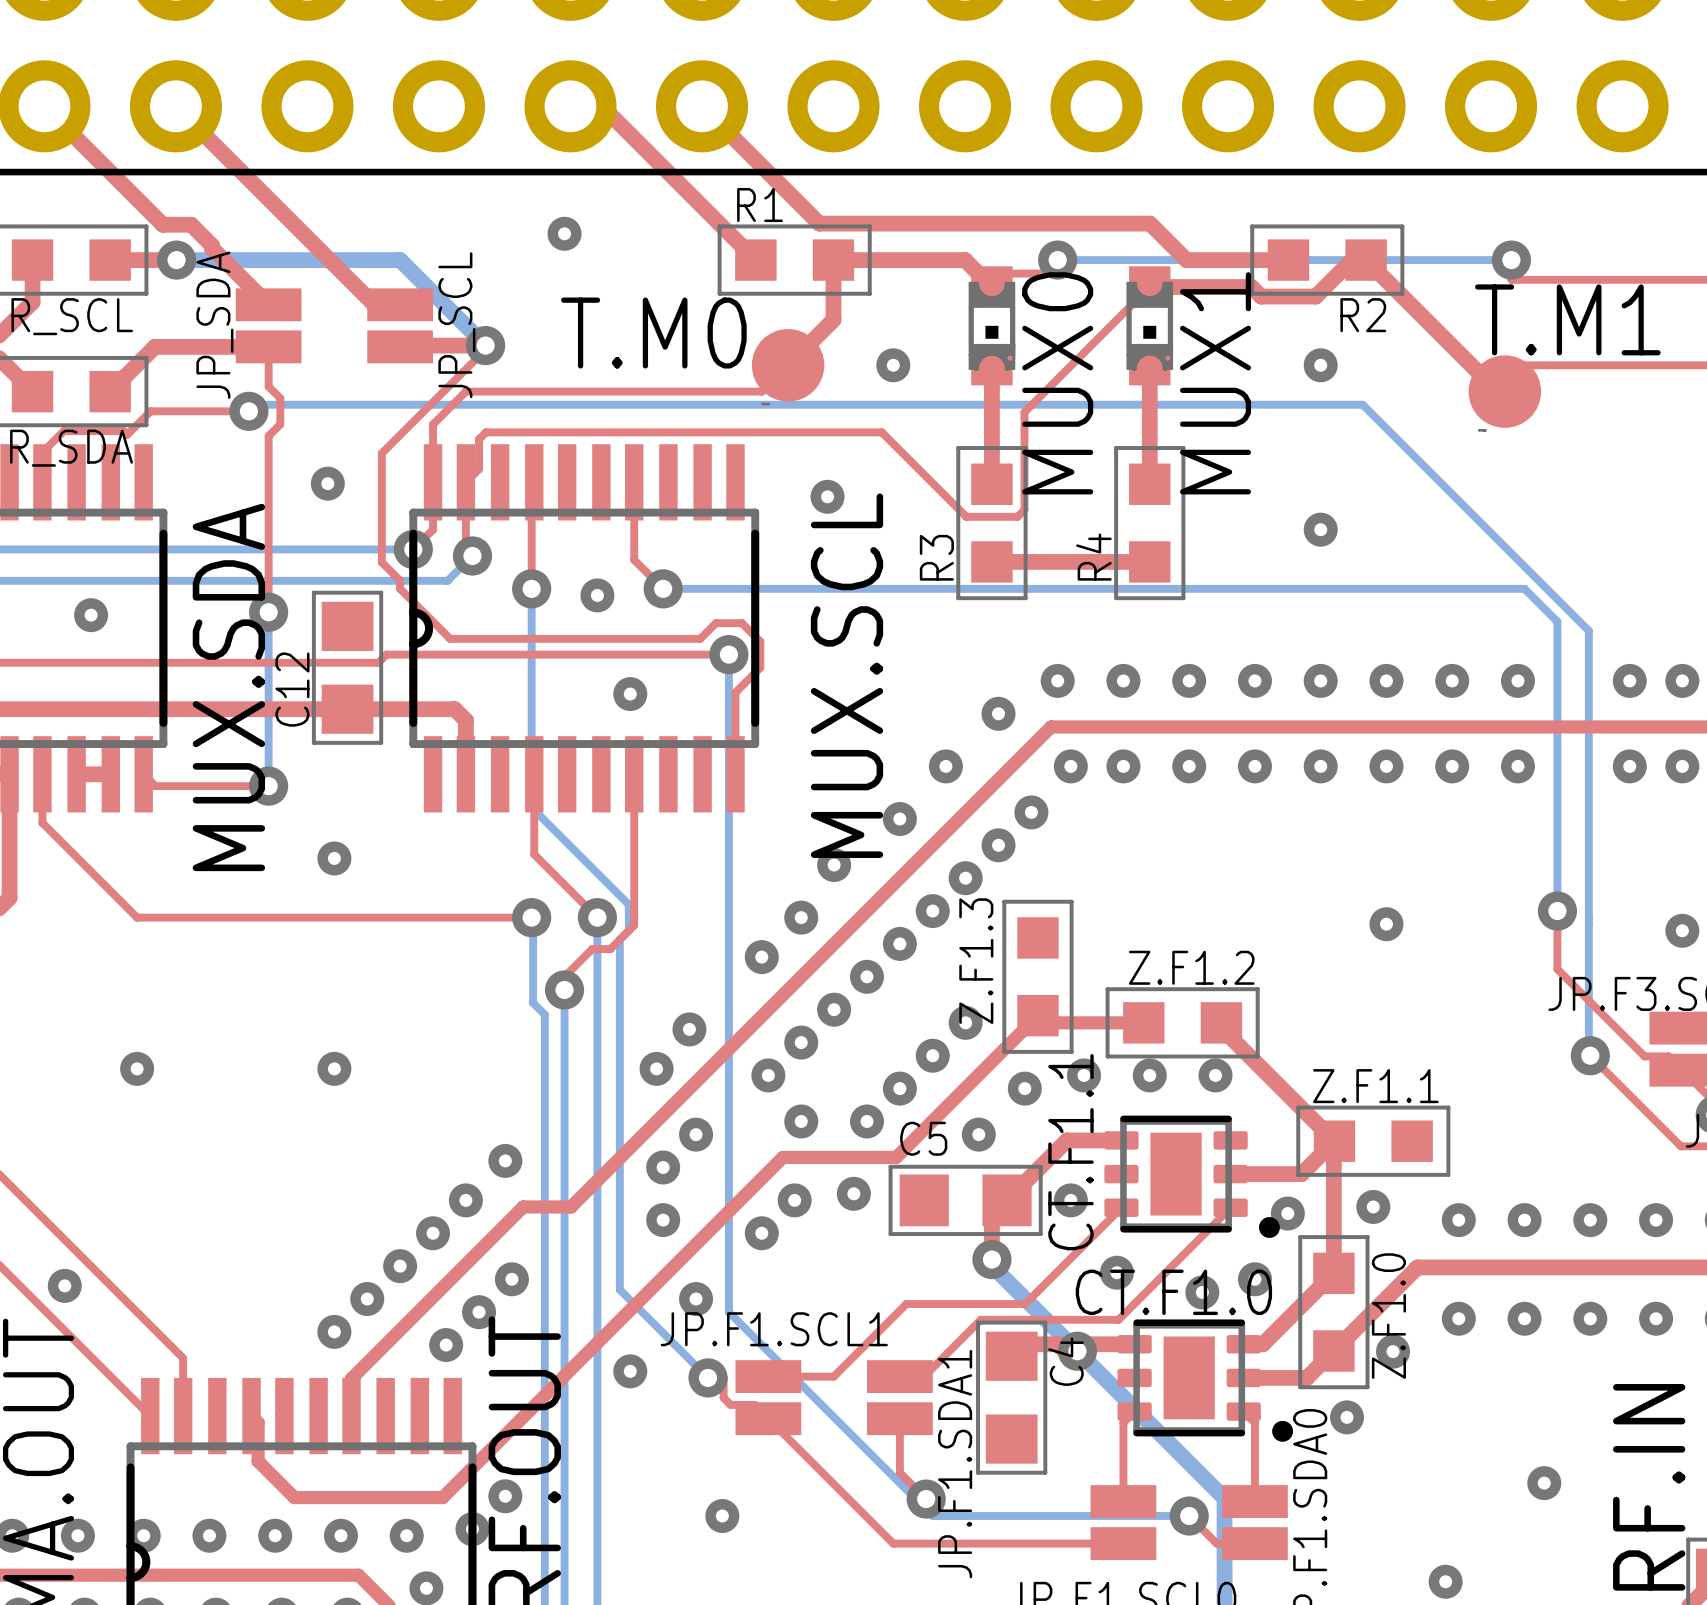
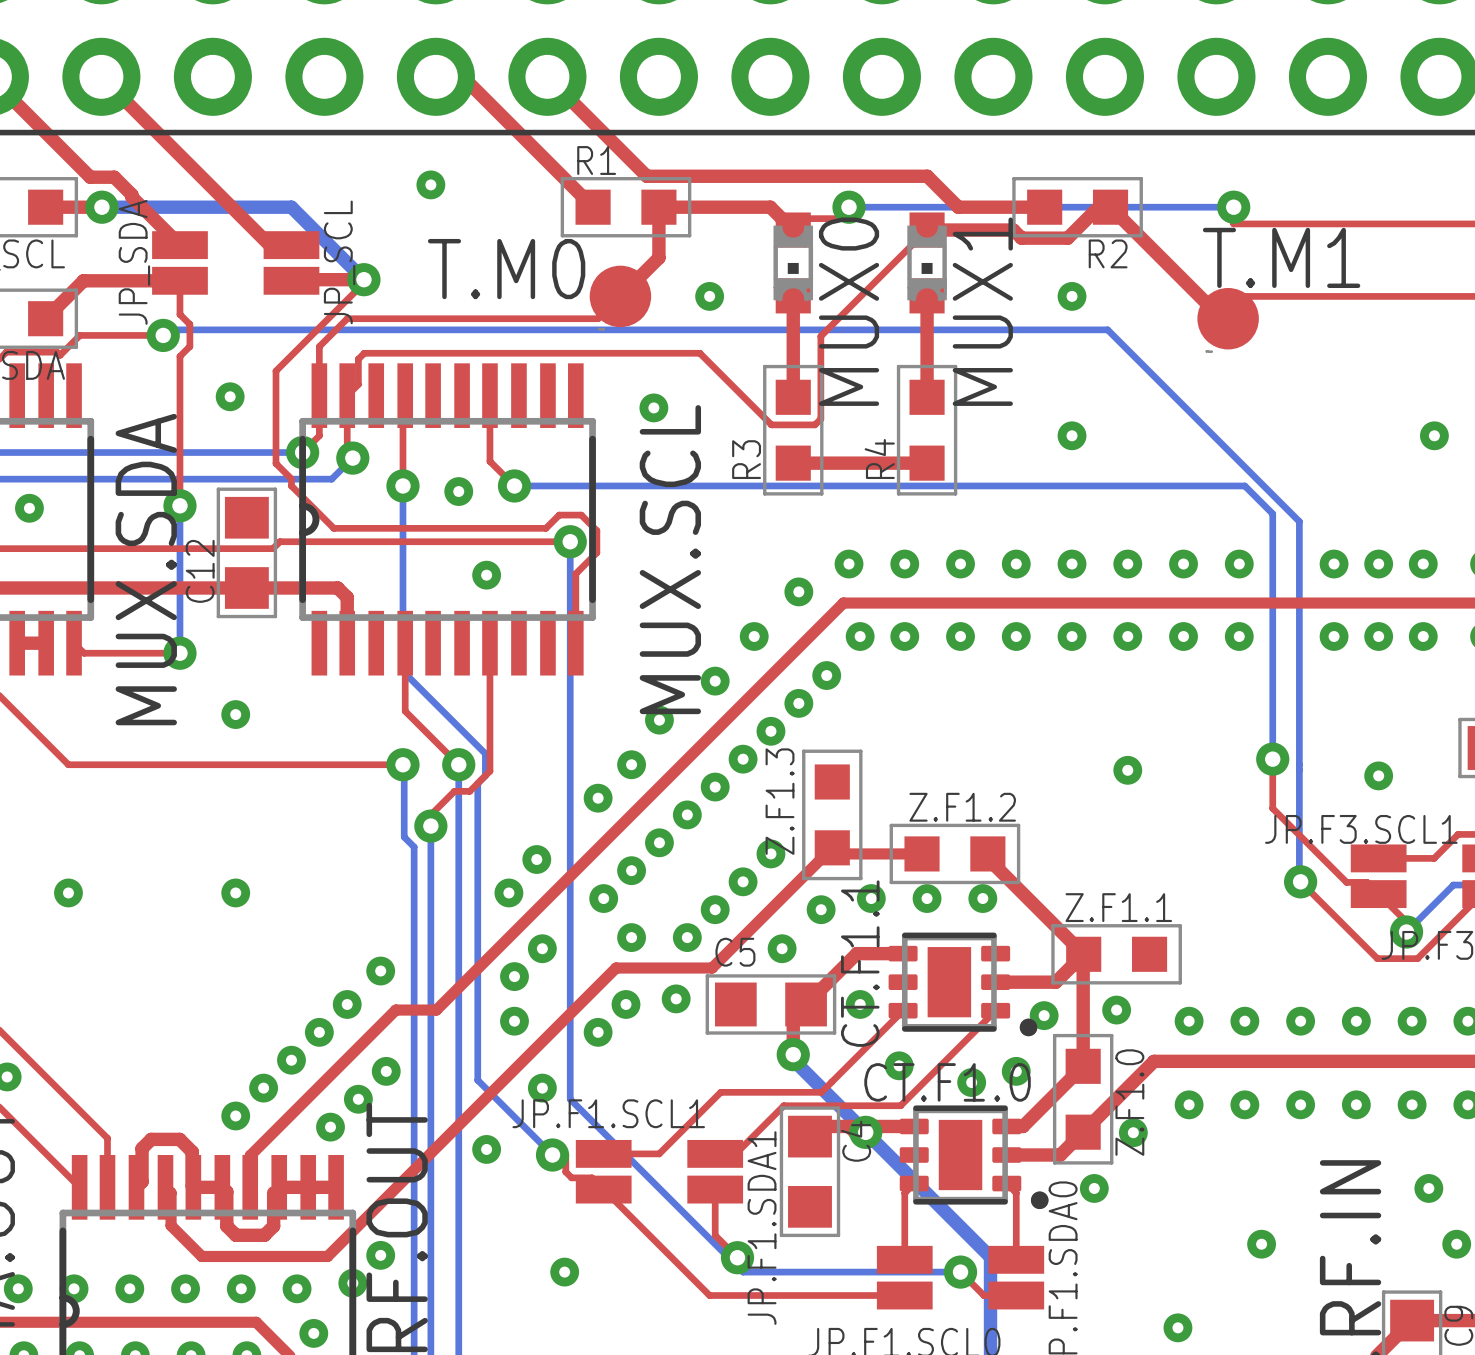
top track: none -> (192, 1186) (192, 1151) (179, 1139) (151, 1139) (142, 1148) (142, 1181) (136, 1187)
top track: none -> (193, 1187) (222, 1187) (226, 1191) (226, 1226) (235, 1235) (264, 1235) (273, 1226) (273, 1192) (279, 1187) (336, 1187)

